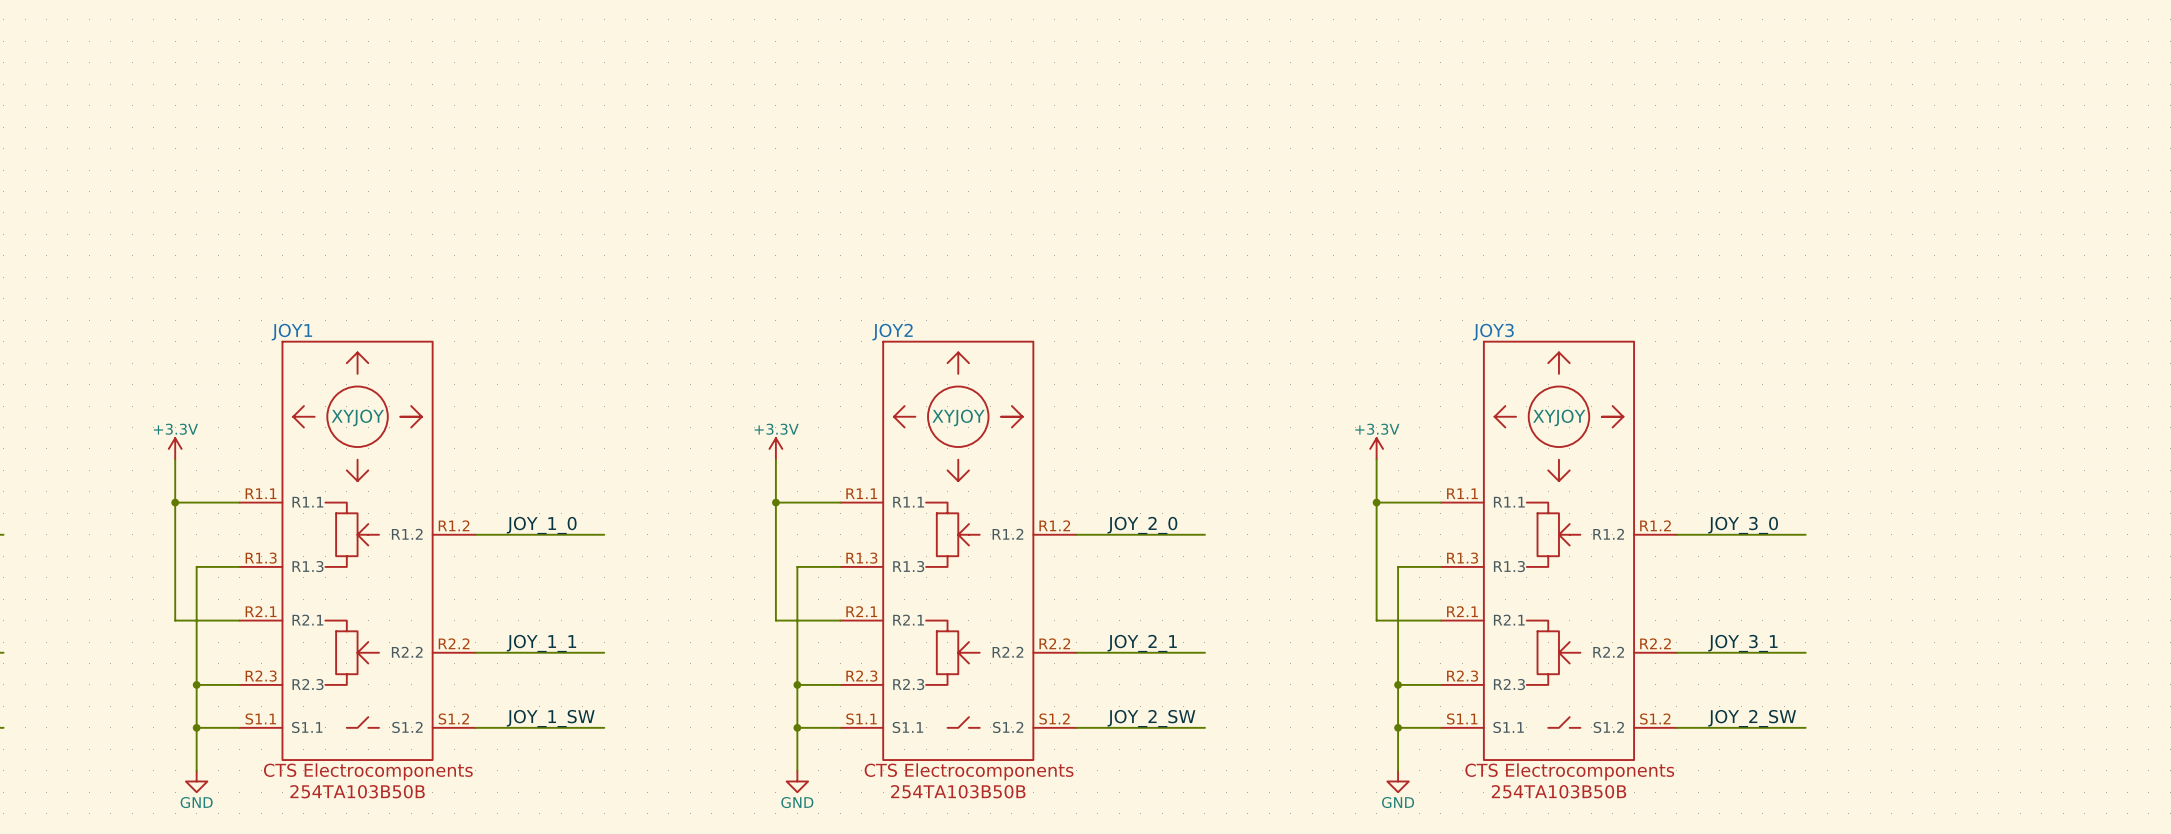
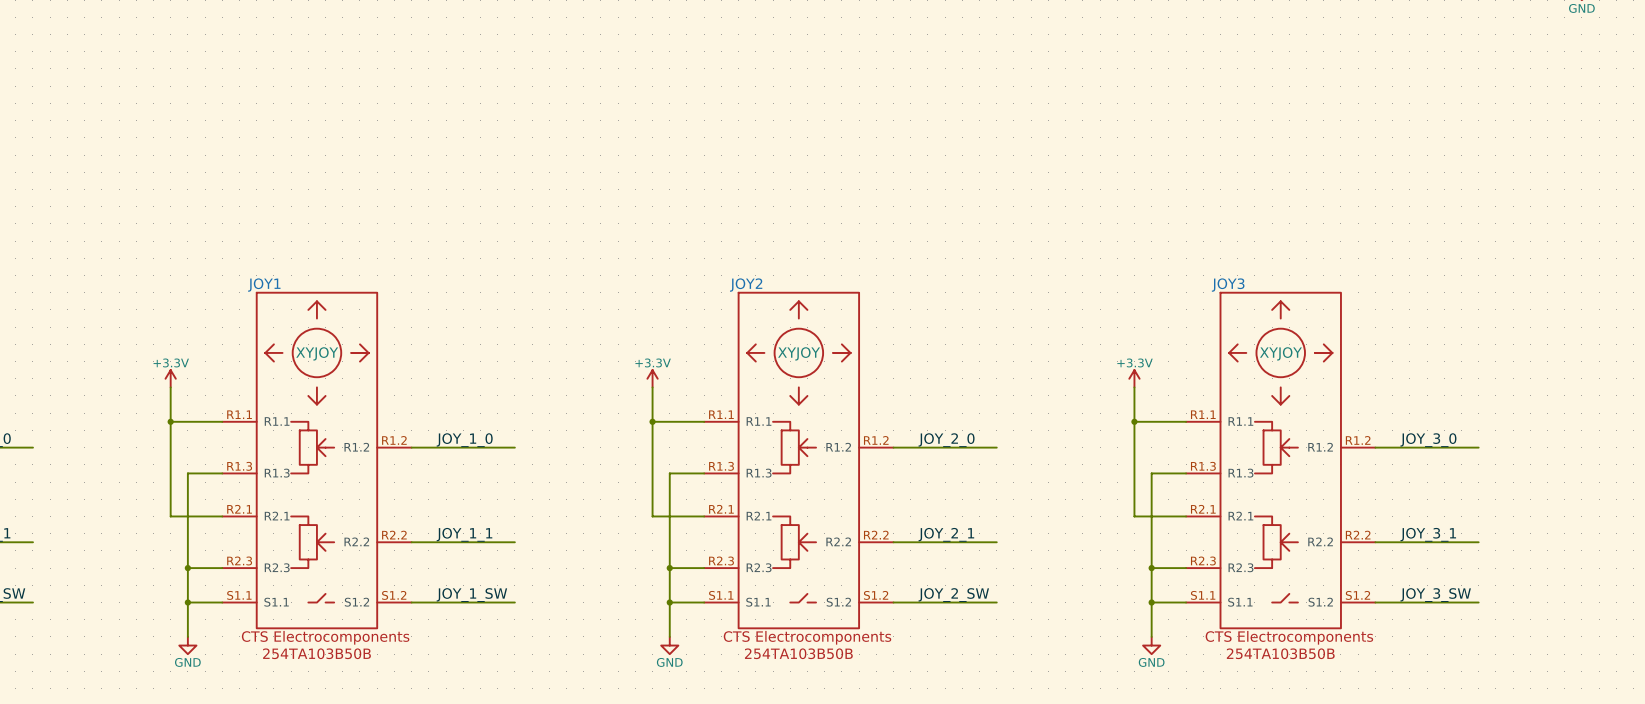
label: JOY_2_SW (1752, 718) -> JOY_3_SW (1435, 595)

